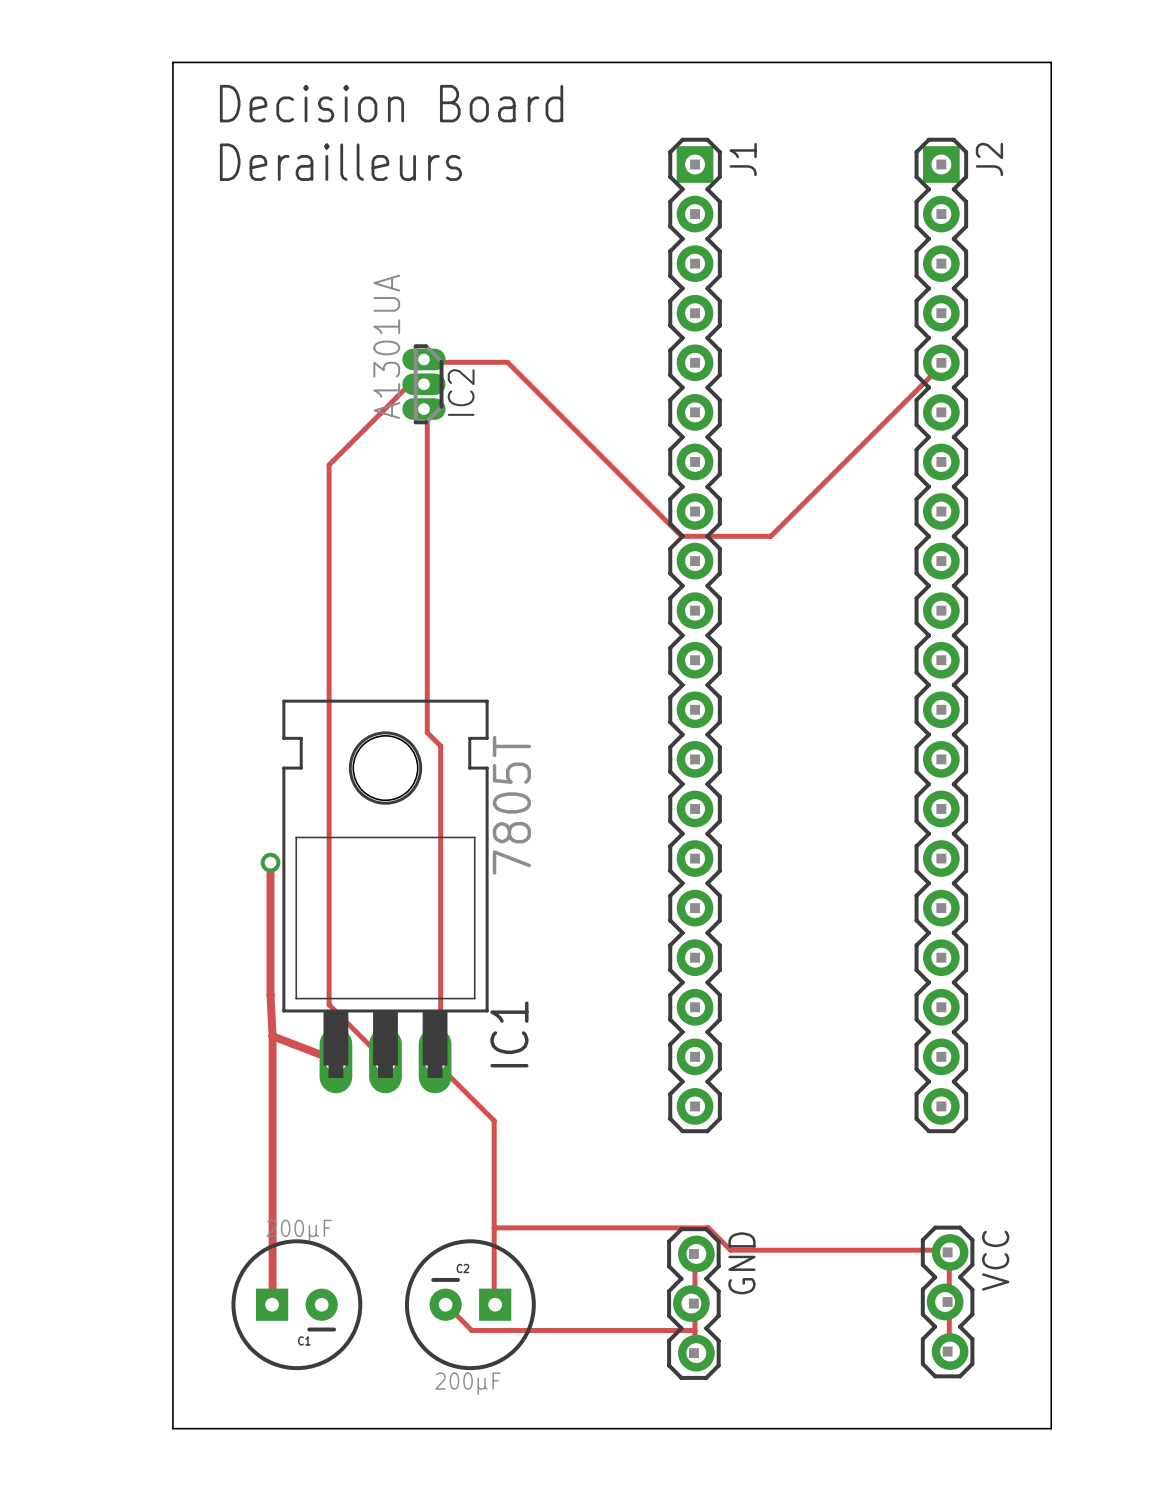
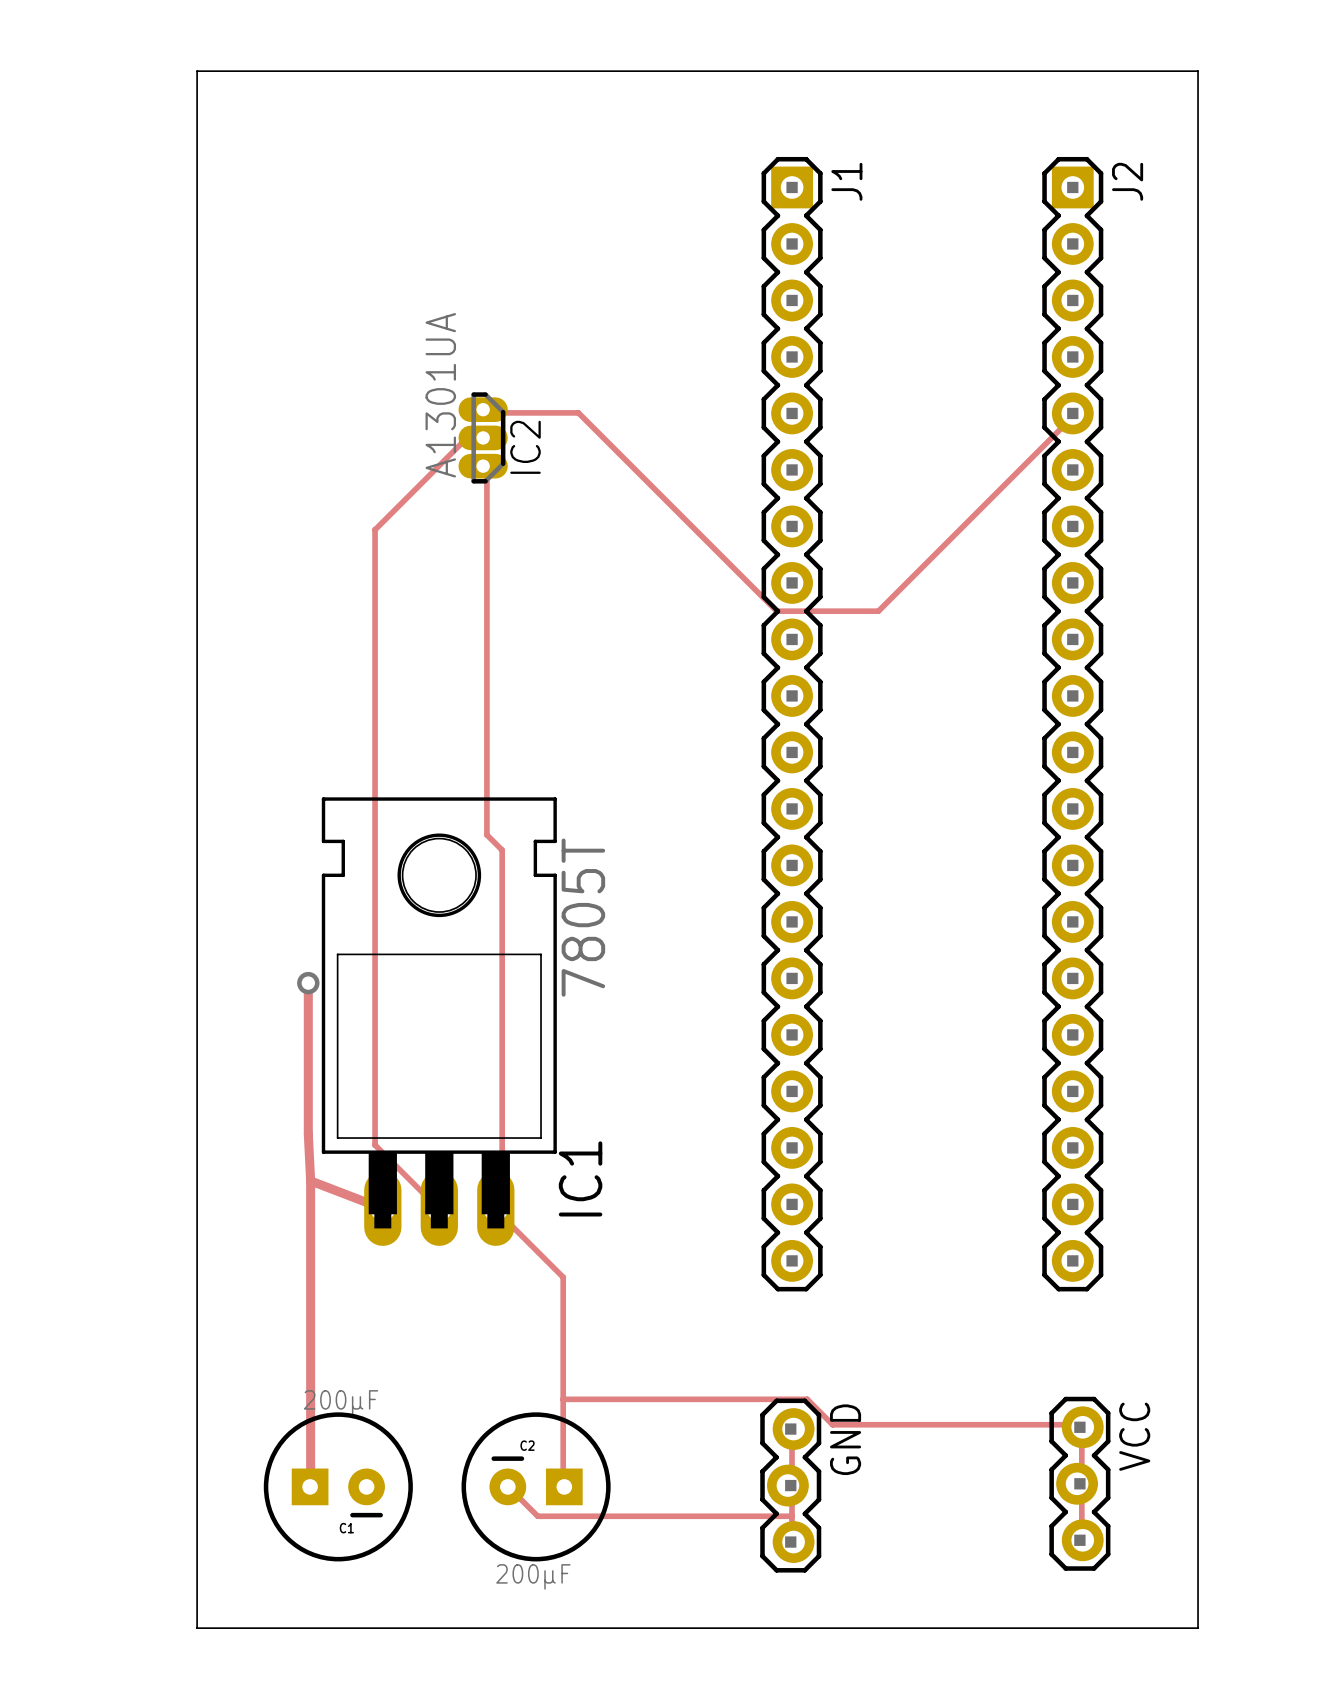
text: Decision Board (391, 103) -> none
text: Derailleurs (340, 162) -> none

